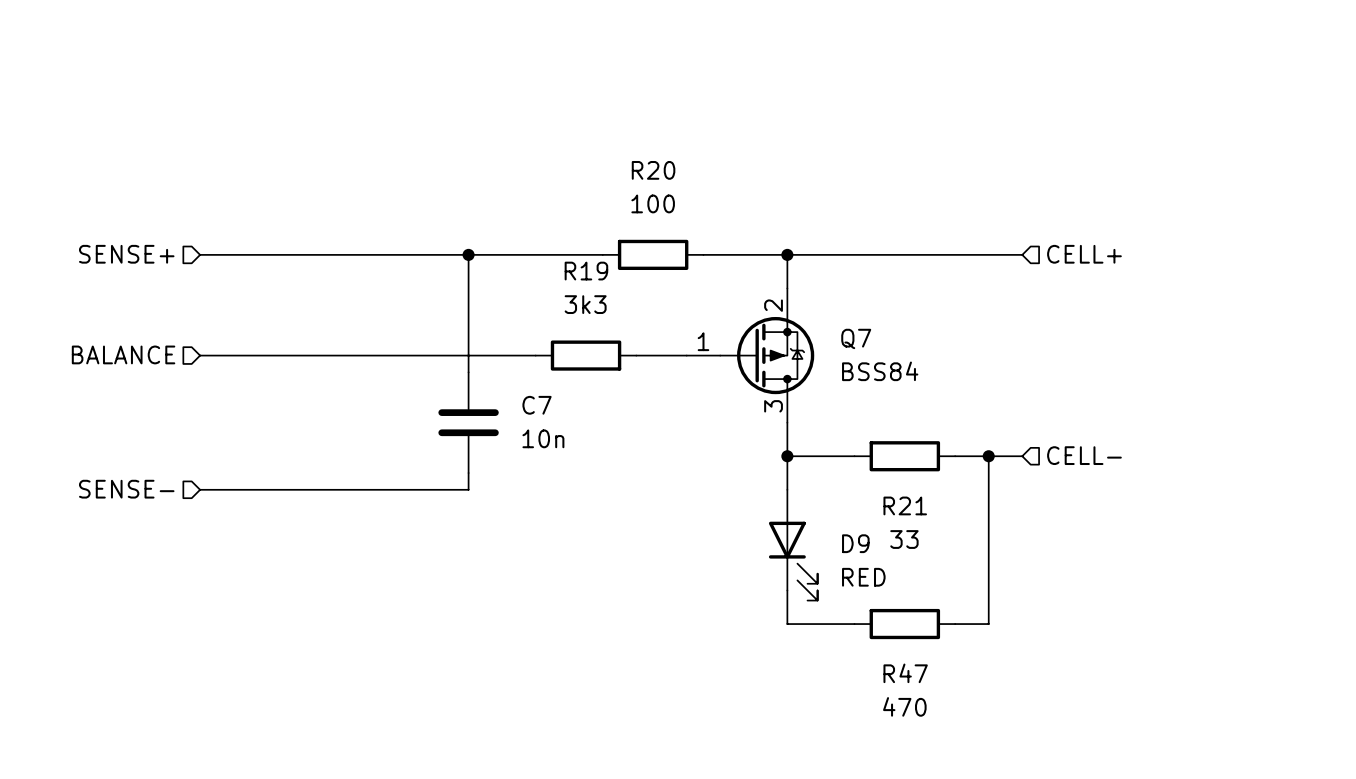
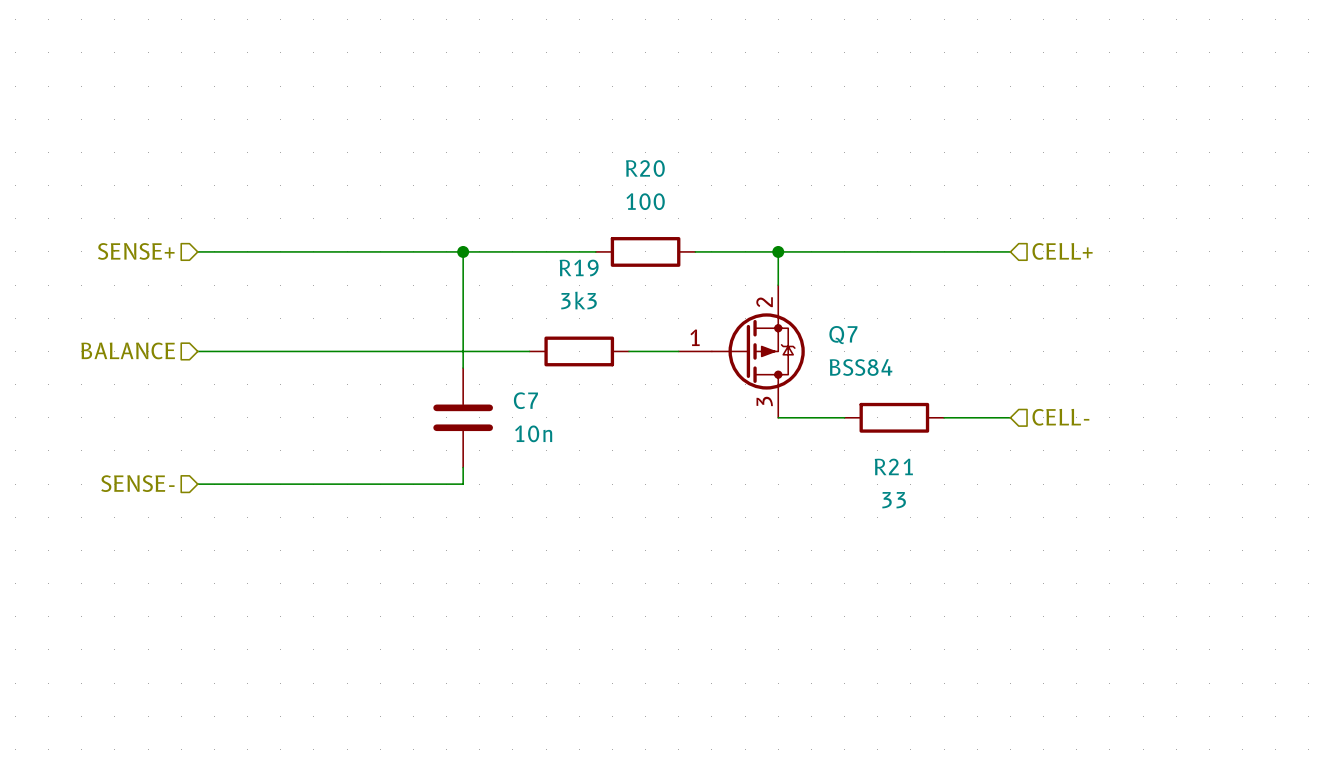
wire: (787, 422) (787, 489) -> (778, 417) (844, 417)
hierarchical label position: CELL- (1084, 455) -> CELL- (1060, 417)
wire: (787, 456) (854, 456) -> none
junction: (787, 456) -> none
R21 position: (904, 456) -> (894, 417)
wire: (955, 456) (1022, 456) -> (944, 417) (1010, 417)
wire: (988, 456) (988, 624) (955, 624) -> none
junction: (988, 456) -> none
D9: RED (793, 545) -> none
wire: (787, 590) (787, 624) (854, 624) -> none
R47: 470 (904, 624) -> none

